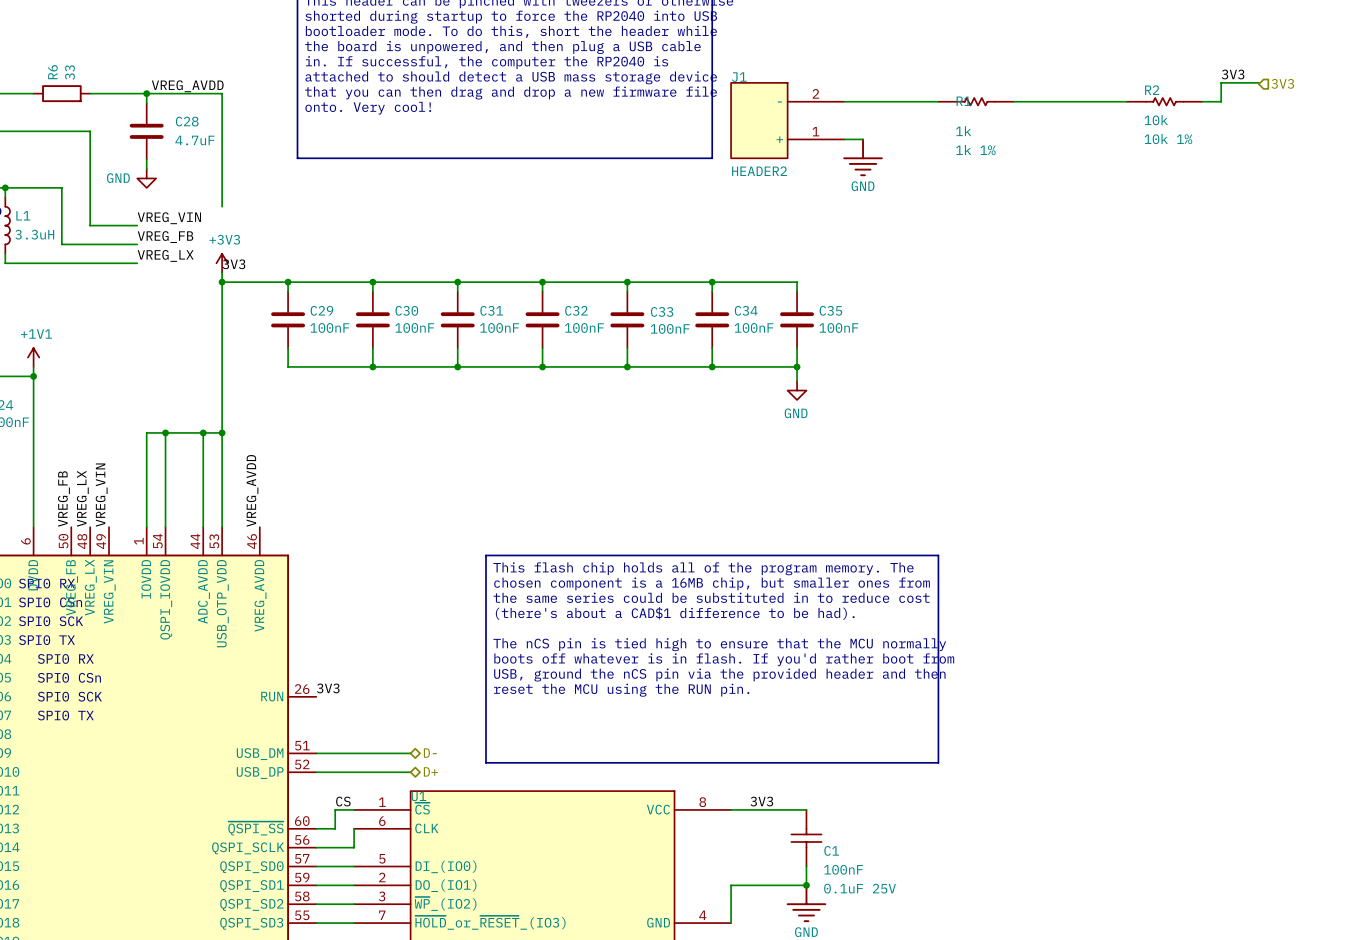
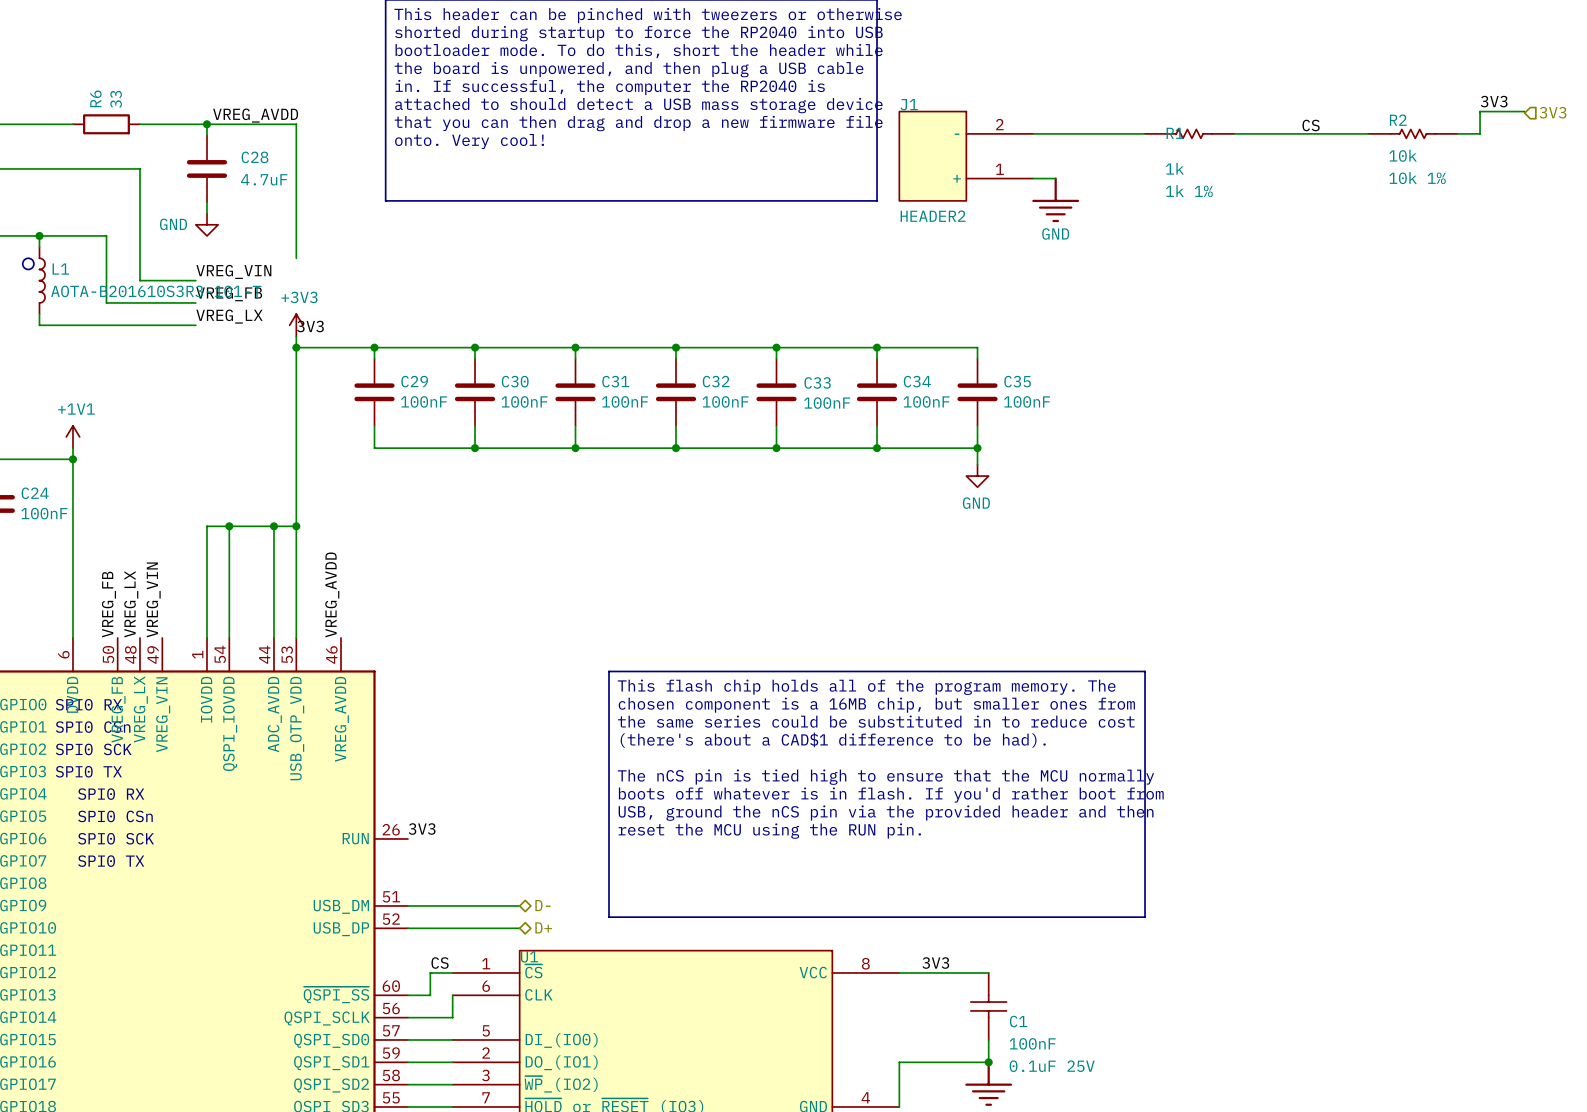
label: none -> CS (1311, 125)
L1 value: 3.3uH (34, 234) -> AOTA-B201610S3R3-101-T (156, 291)

